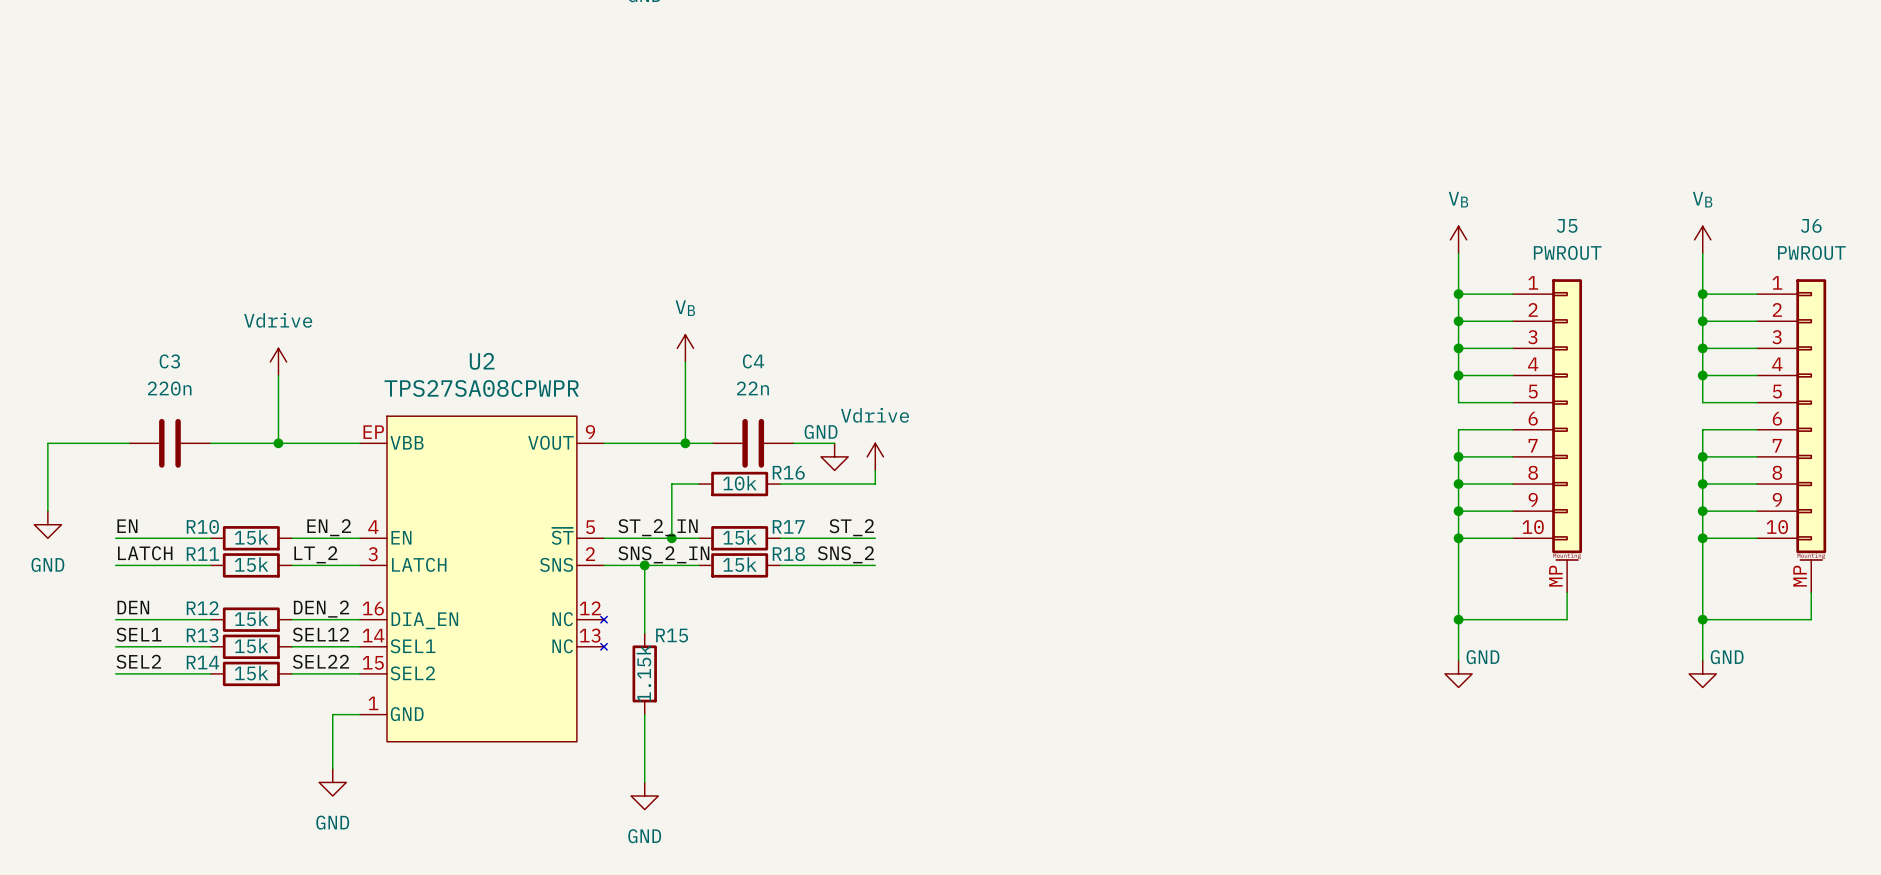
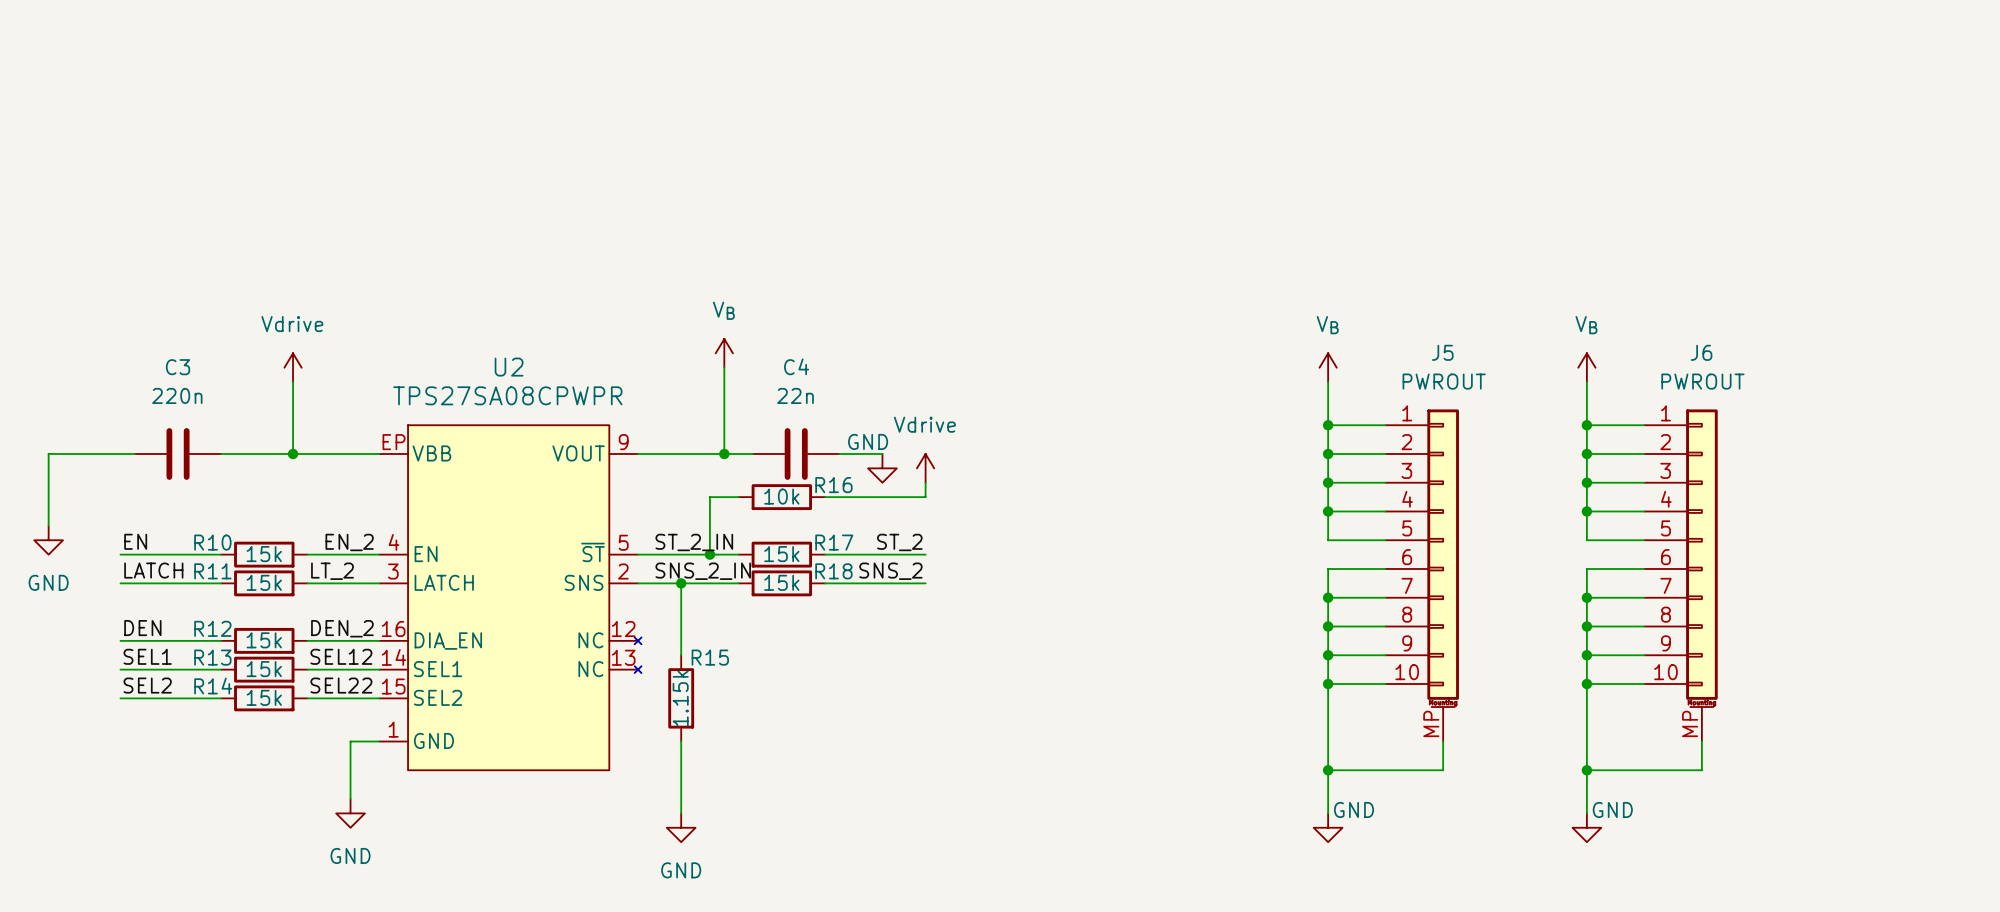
power symbol: VB (1458, 239) -> none
power symbol: VB (1702, 239) -> none
wire: (1458, 253) (1458, 402) (1512, 402) -> (1328, 382) (1328, 540) (1385, 540)
wire: (1702, 253) (1702, 402) (1756, 402) -> (1586, 382) (1586, 540) (1644, 540)
wire: (1458, 294) (1512, 294) -> (1328, 425) (1385, 425)
junction: (1458, 294) -> none
wire: (1702, 294) (1756, 294) -> (1586, 425) (1644, 425)
junction: (1702, 294) -> none
wire: (1458, 321) (1512, 321) -> (1328, 453) (1385, 453)
junction: (1458, 321) -> none
wire: (1702, 321) (1756, 321) -> (1586, 453) (1644, 453)
junction: (1702, 321) -> none
wire: (1458, 348) (1512, 348) -> (1328, 482) (1385, 482)
junction: (1458, 348) -> none
wire: (1702, 348) (1756, 348) -> (1586, 482) (1644, 482)
junction: (1702, 348) -> none
power symbol: none -> VB (1328, 367)
power symbol: none -> VB (1586, 367)
wire: (1458, 375) (1512, 375) -> (1328, 511) (1385, 511)
junction: (1458, 375) -> none
wire: (1702, 375) (1756, 375) -> (1586, 511) (1644, 511)
junction: (1702, 375) -> none
junction: none -> (1328, 425)
junction: none -> (1586, 425)
wire: (1512, 429) (1458, 429) (1458, 660) -> (1385, 569) (1328, 569) (1328, 813)
wire: (1756, 429) (1702, 429) (1702, 660) -> (1644, 569) (1586, 569) (1586, 813)
J5 position: (1547, 435) -> (1422, 575)
J6 position: (1791, 435) -> (1681, 575)
junction: none -> (1328, 453)
junction: none -> (1586, 453)
wire: (1458, 456) (1512, 456) -> (1328, 597) (1385, 597)
junction: (1458, 456) -> none
wire: (1702, 456) (1756, 456) -> (1586, 597) (1644, 597)
junction: (1702, 456) -> none
junction: none -> (1328, 482)
junction: none -> (1586, 482)
wire: (1458, 484) (1512, 484) -> (1328, 626) (1385, 626)
junction: (1458, 484) -> none
wire: (1702, 484) (1756, 484) -> (1586, 626) (1644, 626)
junction: (1702, 484) -> none
junction: none -> (1328, 511)
junction: none -> (1586, 511)
wire: (1458, 511) (1512, 511) -> (1328, 655) (1385, 655)
junction: (1458, 511) -> none
wire: (1702, 511) (1756, 511) -> (1586, 655) (1644, 655)
junction: (1702, 511) -> none
wire: (1458, 538) (1512, 538) -> (1328, 684) (1385, 684)
junction: (1458, 538) -> none
wire: (1702, 538) (1756, 538) -> (1586, 684) (1644, 684)
junction: (1702, 538) -> none
junction: none -> (1328, 597)
junction: none -> (1586, 597)
wire: (1567, 592) (1567, 619) (1458, 619) -> (1443, 741) (1443, 770) (1328, 770)
wire: (1811, 592) (1811, 619) (1702, 619) -> (1701, 741) (1701, 770) (1586, 770)
junction: none -> (1328, 626)
junction: none -> (1586, 626)
junction: (1458, 619) -> none
junction: (1702, 619) -> none
junction: none -> (1328, 655)
junction: none -> (1586, 655)
junction: none -> (1328, 684)
junction: none -> (1586, 684)
power symbol: GND (1458, 673) -> none
power symbol: GND (1702, 673) -> none
junction: none -> (1328, 770)
junction: none -> (1586, 770)
power symbol: none -> GND (1328, 827)
power symbol: none -> GND (1586, 827)

